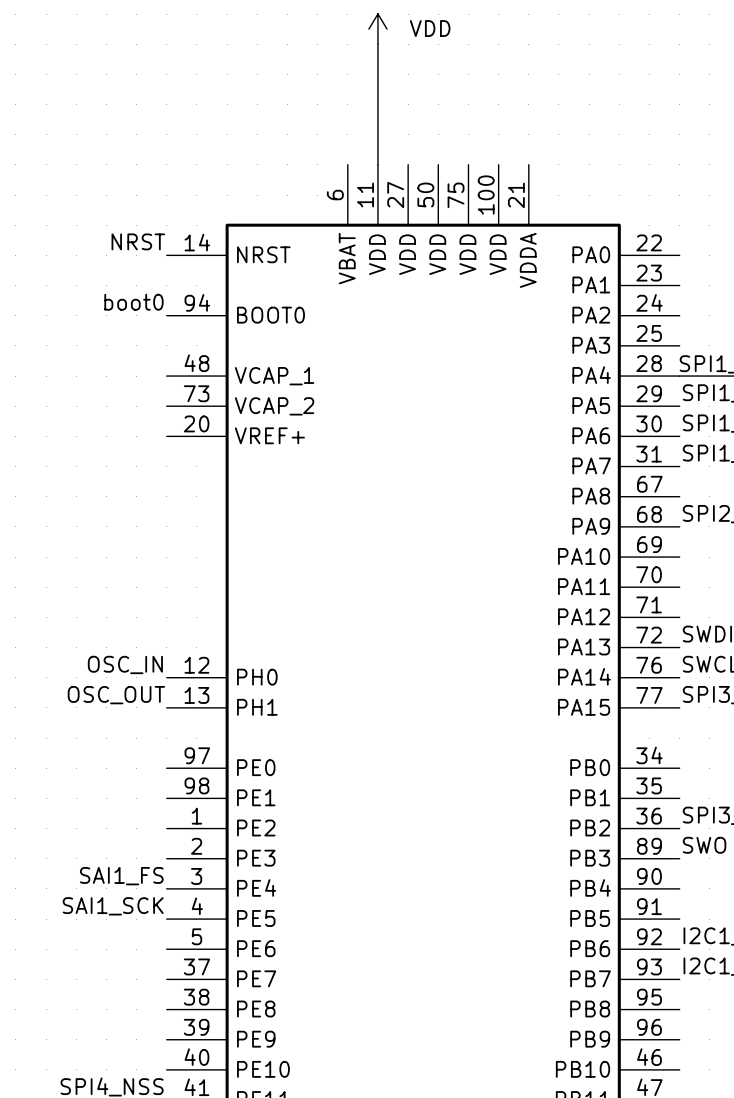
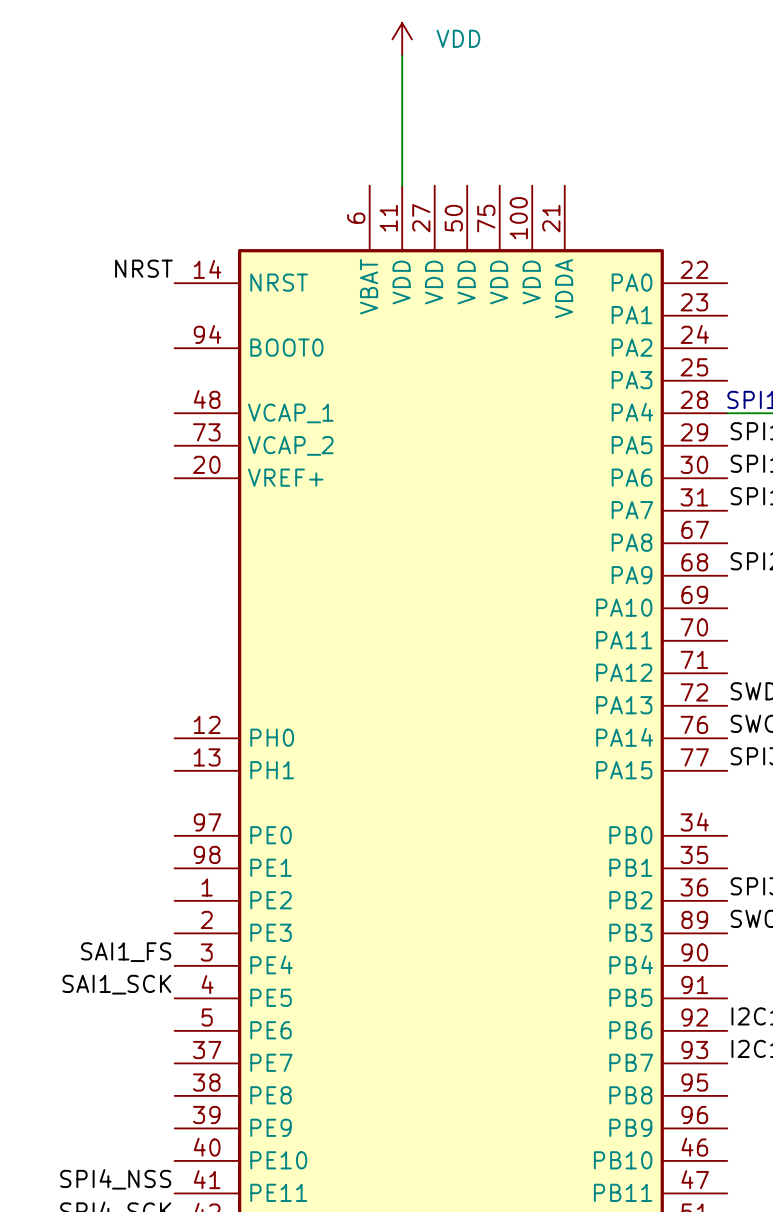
label: boot0 (133, 302) -> none
label: OSC_IN (125, 664) -> none
label: OSC_OUT (116, 695) -> none

